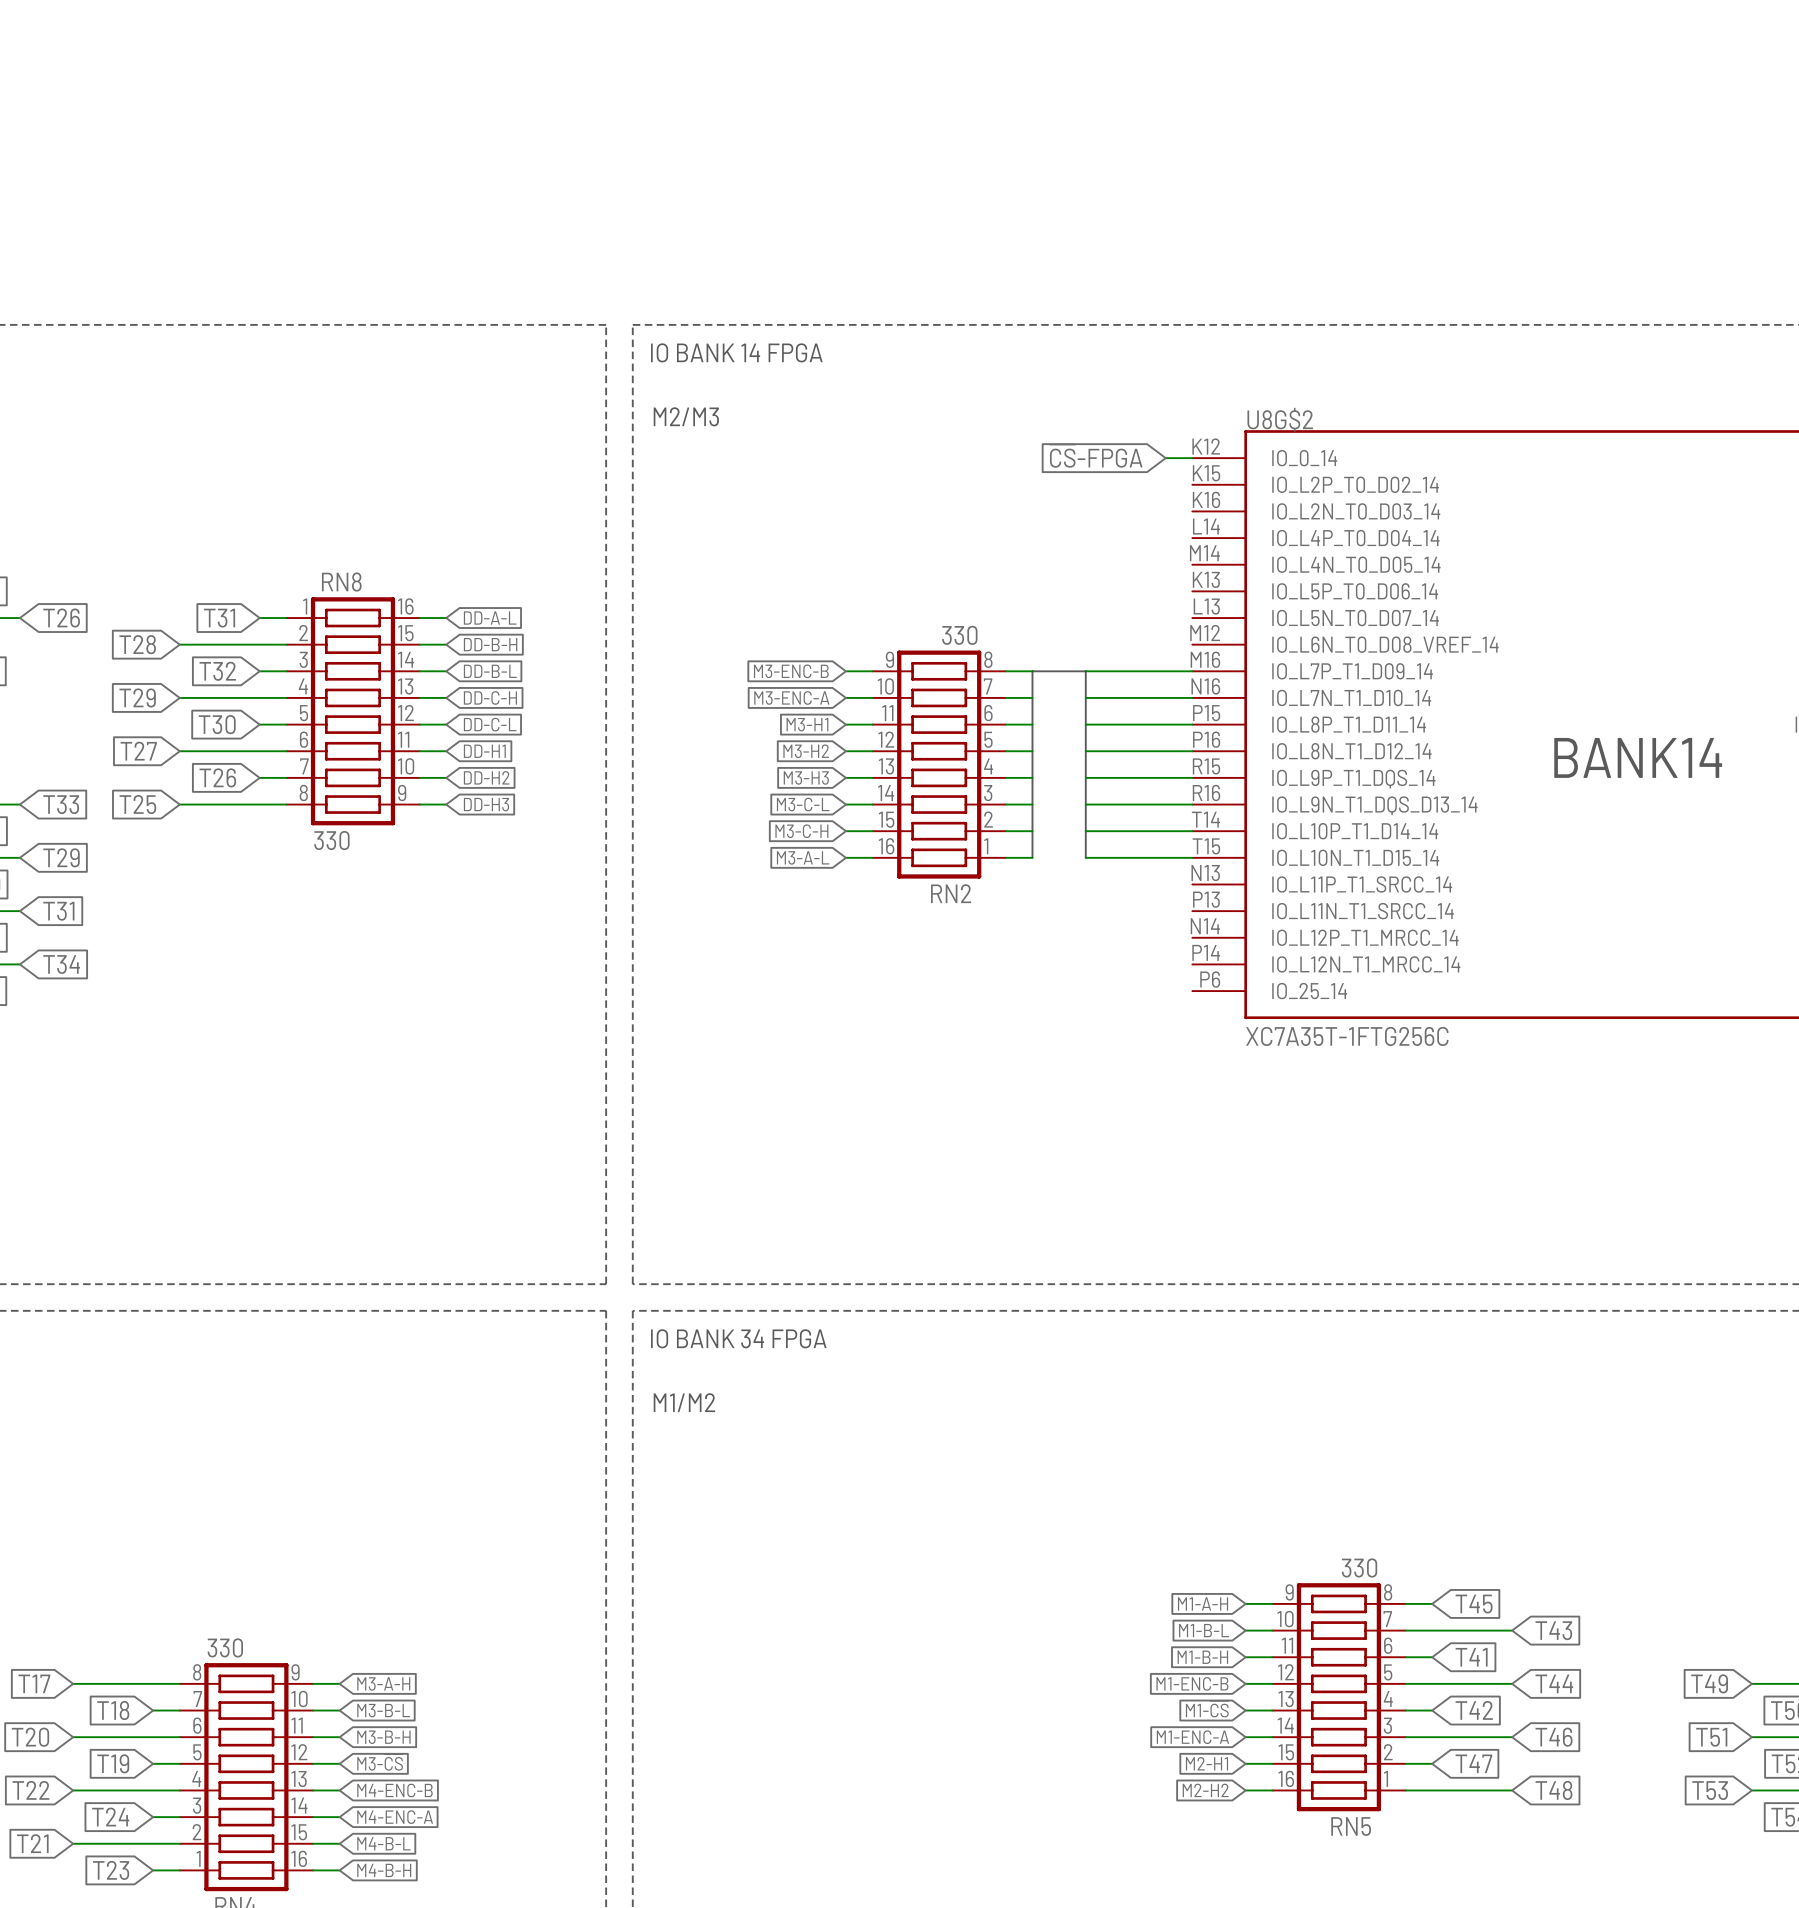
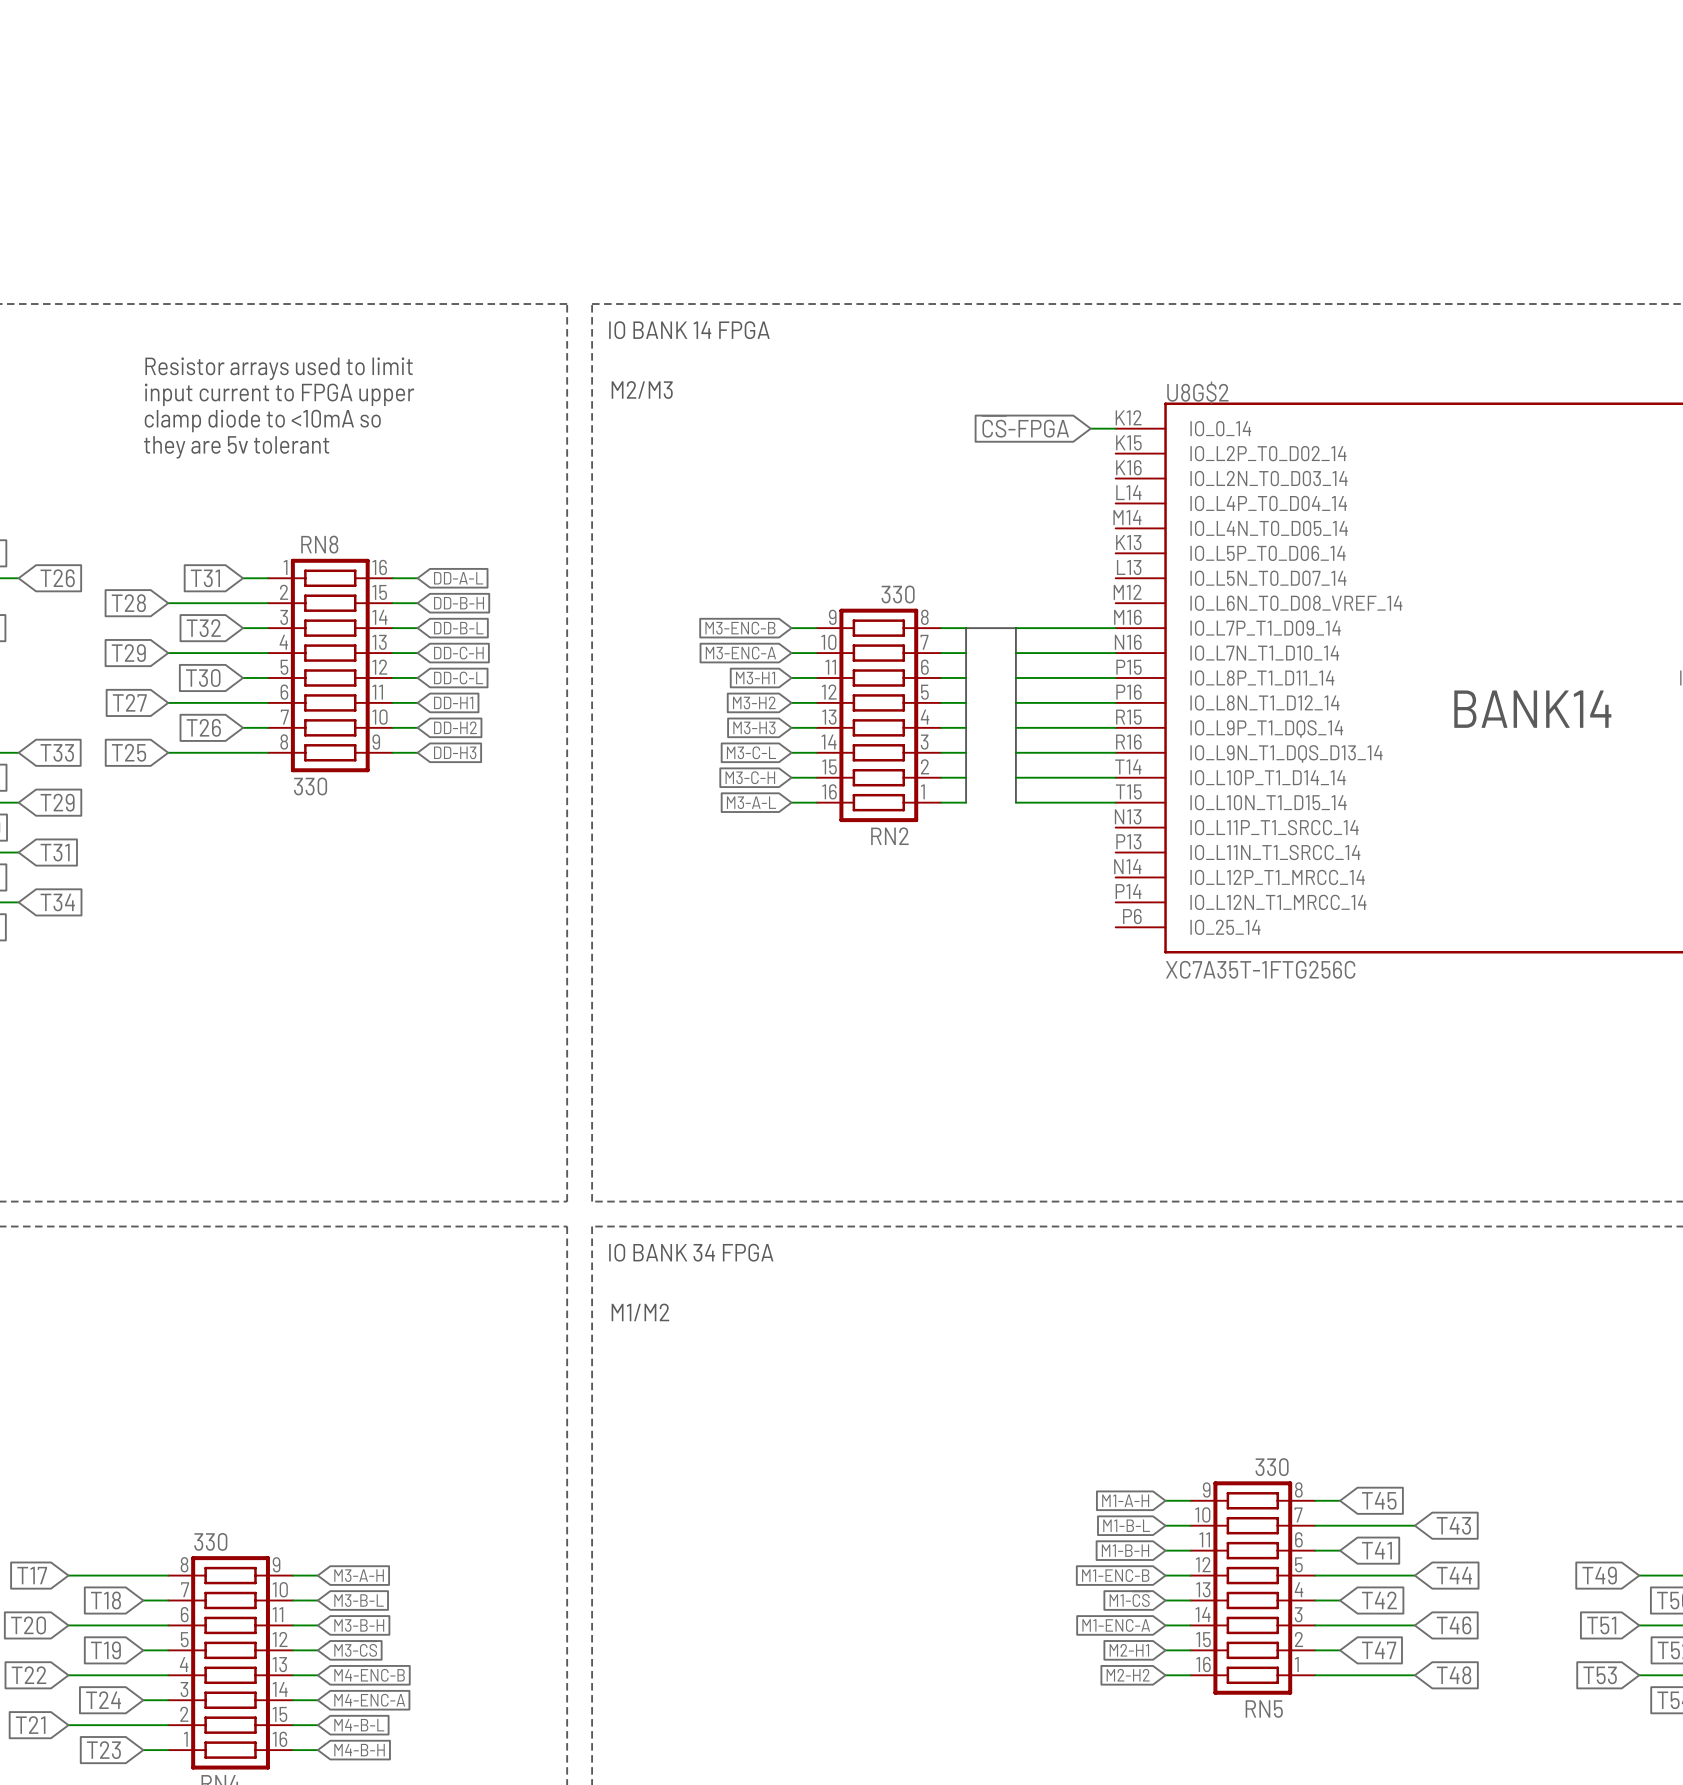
text: none -> Resistor arrays used to limit (279, 368)
text: none -> input current to FPGA upper (279, 394)
text: none -> clamp diode to <10mA so (262, 420)
text: none -> they are 5v tolerant (236, 447)

